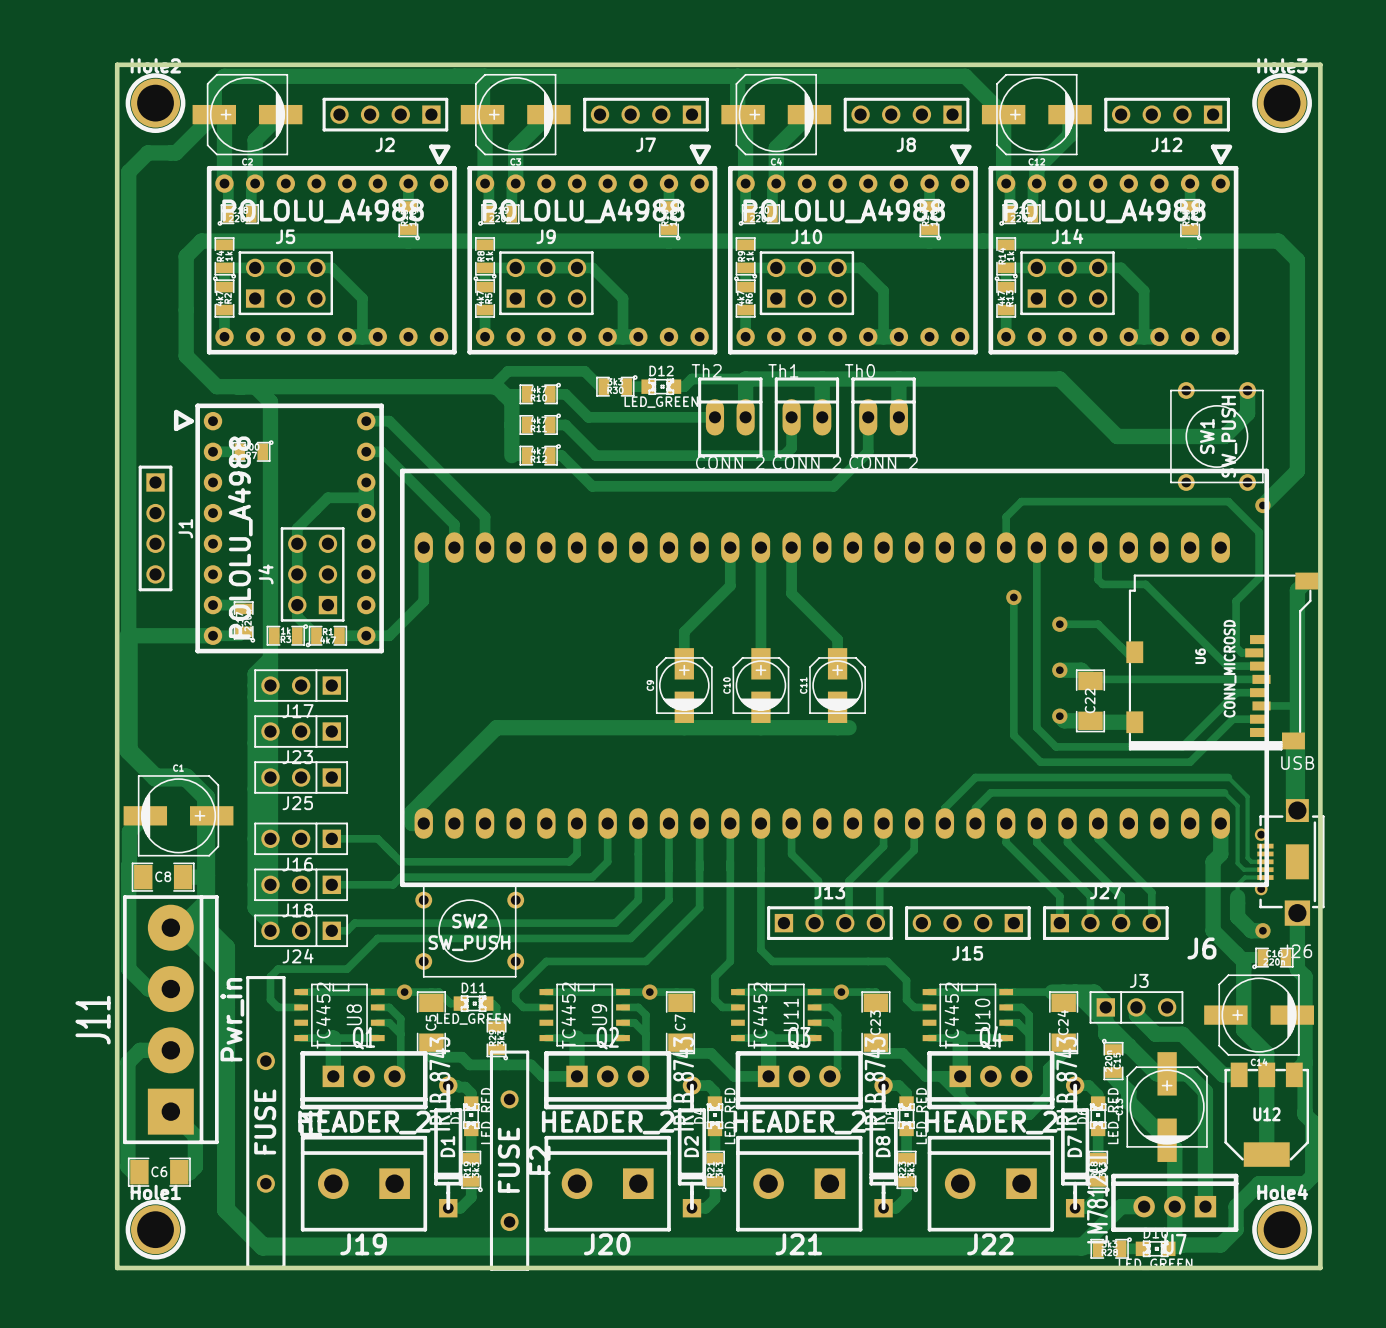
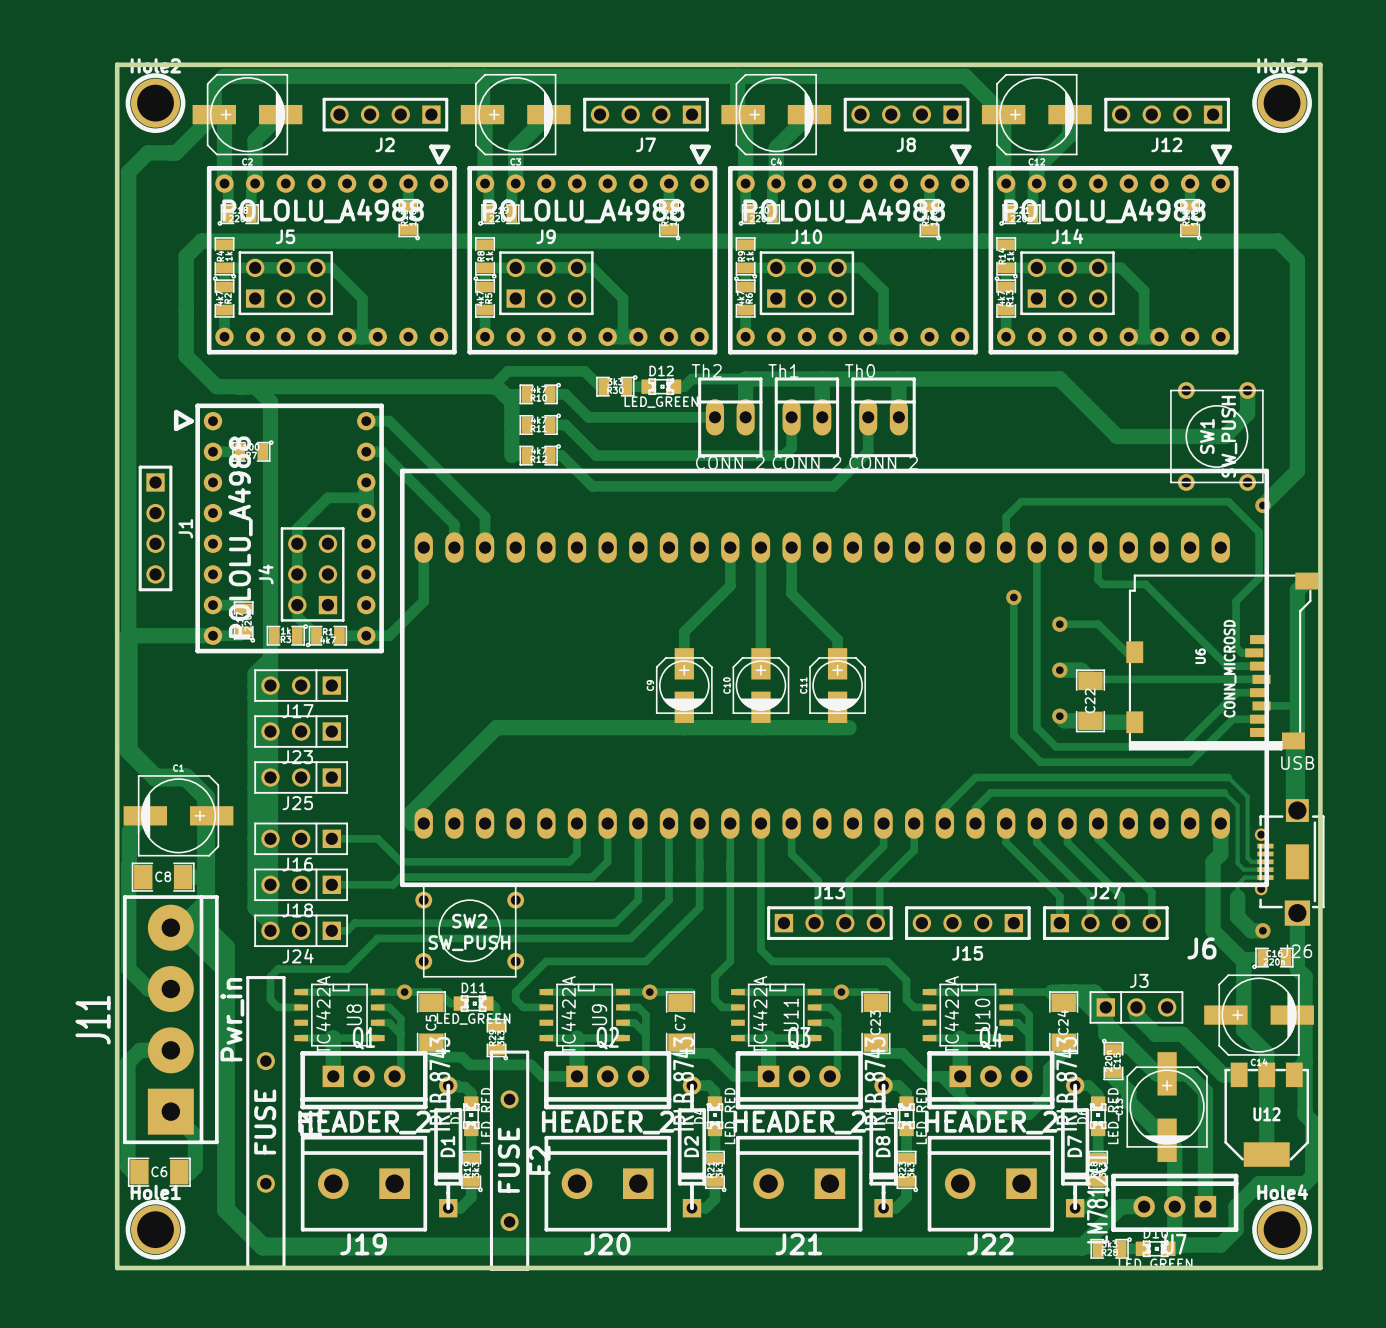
U8 value: TC4452 (323, 1015) -> TC4422A (323, 1015)
U9 value: TC4452 (568, 1015) -> TC4422A (568, 1015)
U11 value: TC4452 (760, 1015) -> TC4422A (760, 1015)
U10 value: TC4452 (951, 1015) -> TC4422A (951, 1015)

